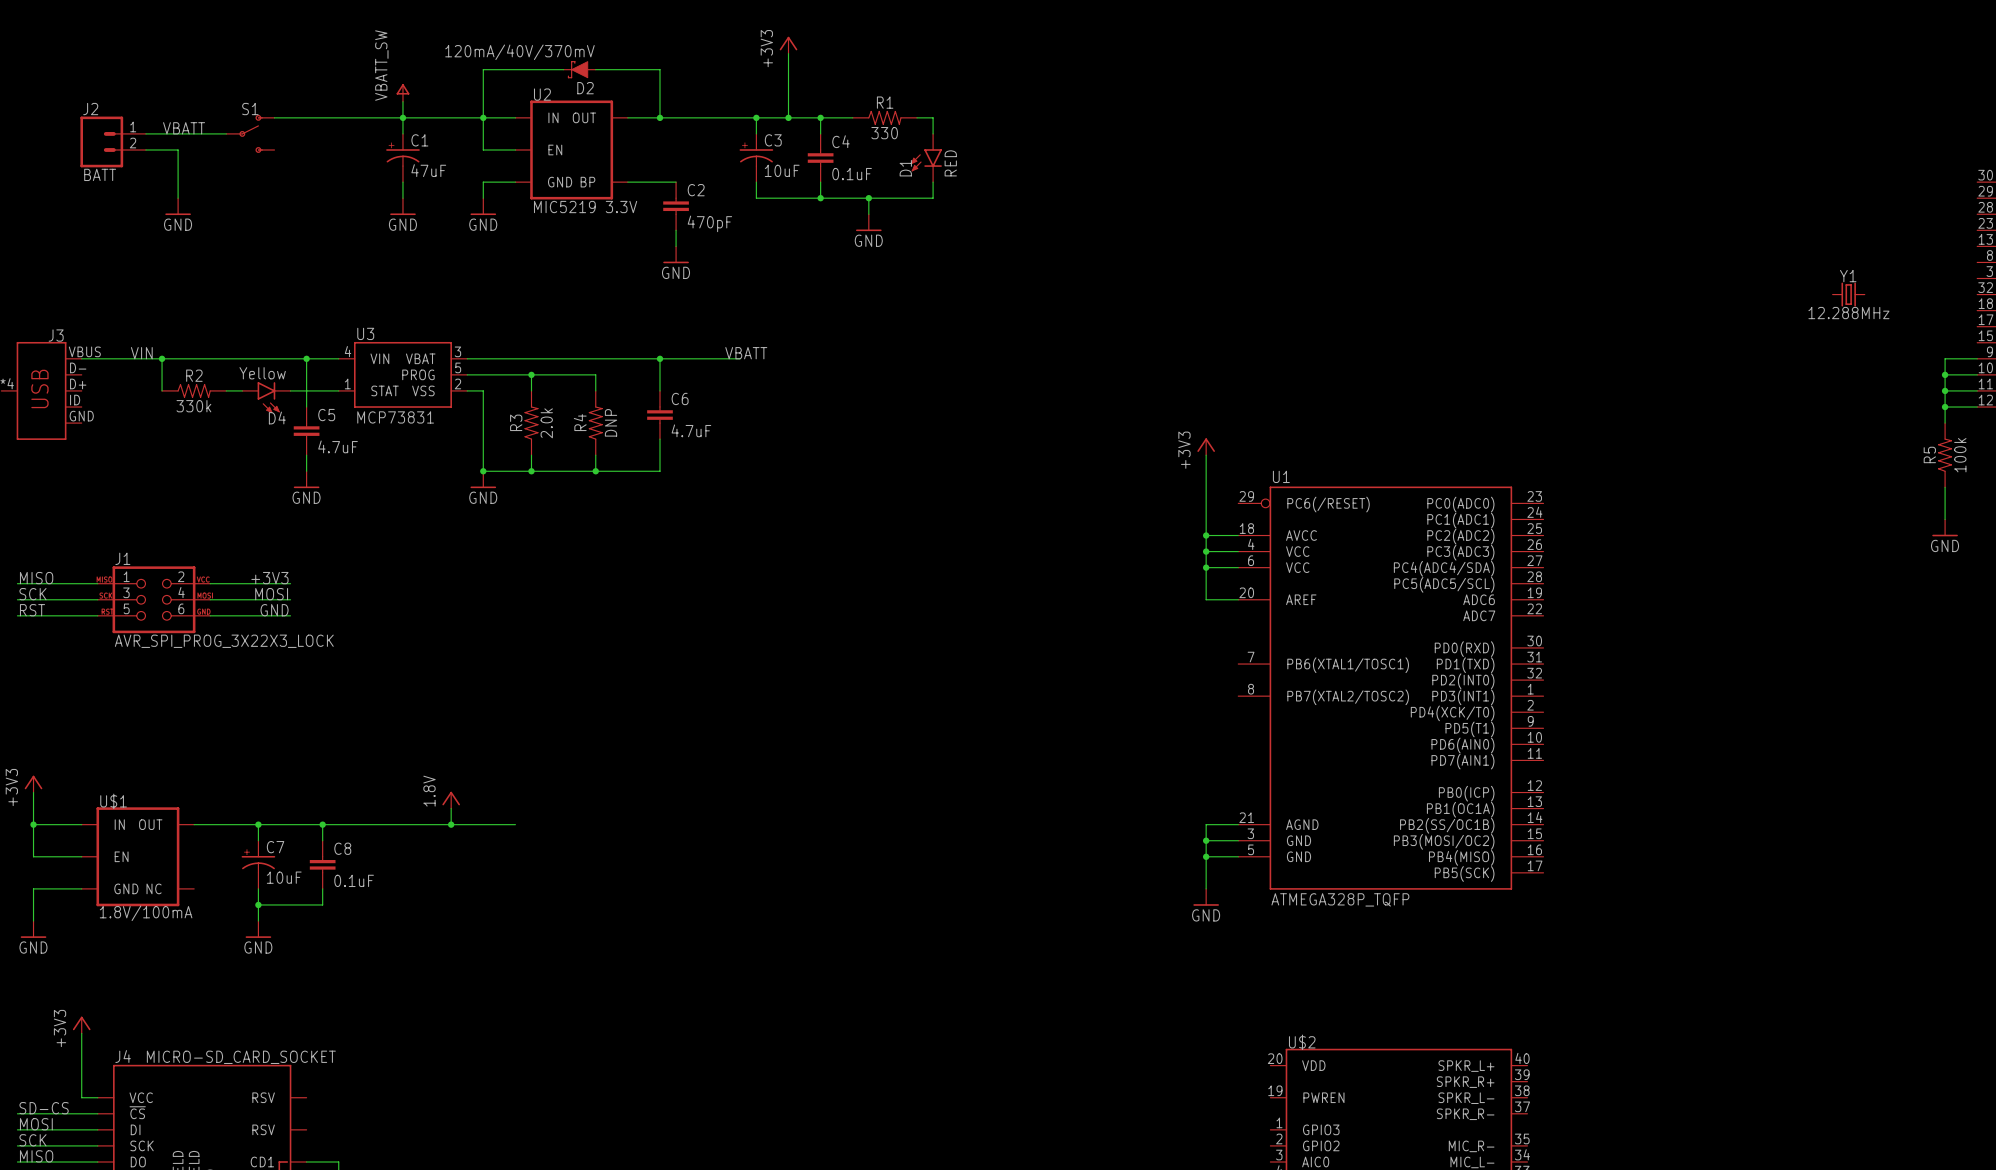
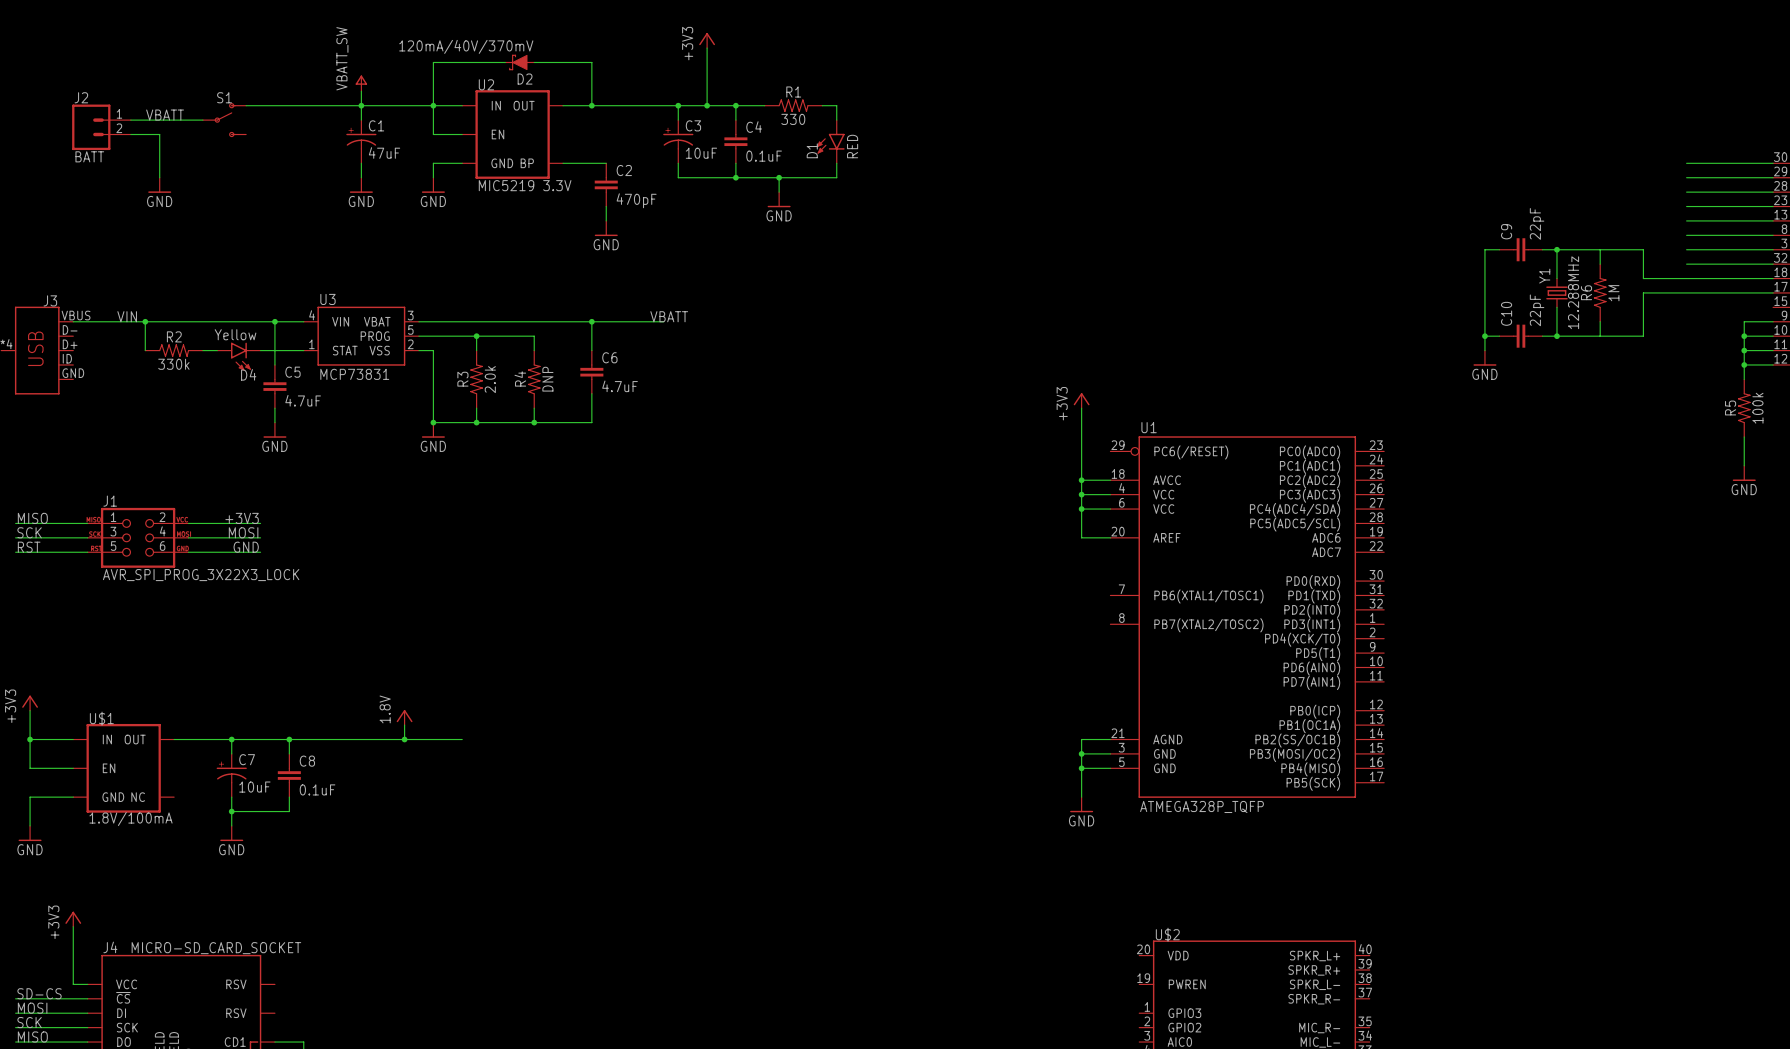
wire: none -> (1686, 163) (1773, 163)
wire: none -> (1686, 177) (1773, 177)
wire: none -> (1686, 192) (1773, 192)
wire: none -> (1686, 206) (1773, 206)
wire: none -> (1686, 220) (1773, 220)
wire: none -> (1686, 235) (1773, 235)
Y1 name position: Y1 (1848, 276) -> Y1 (1544, 276)
wire: none -> (1499, 249) (1484, 249) (1484, 350)
C9: none -> 22pF (1520, 249)
wire: none -> (1542, 249) (1643, 249) (1643, 278) (1773, 278)
wire: none -> (1556, 249) (1556, 278)
junction: none -> (1556, 249)
wire: none -> (1600, 249) (1600, 264)
wire: none -> (1686, 249) (1773, 249)
Y1 rotation: 0° (1848, 294) -> 90° clockwise (1556, 292)
Y1 position: (1848, 294) -> (1556, 292)
wire: none -> (1686, 264) (1773, 264)
Y1 value position: 12.288MHz (1848, 313) -> 12.288MHz (1573, 292)
R6: none -> 1M (1600, 292)
wire: none -> (1773, 292) (1643, 292) (1643, 336) (1542, 336)
wire: none -> (1556, 307) (1556, 336)
wire: none -> (1600, 321) (1600, 336)
wire: none -> (1484, 336) (1499, 336)
junction: none -> (1484, 336)
C10: none -> 22pF (1520, 336)
junction: none -> (1556, 336)
power symbol: none -> GND (1484, 358)

